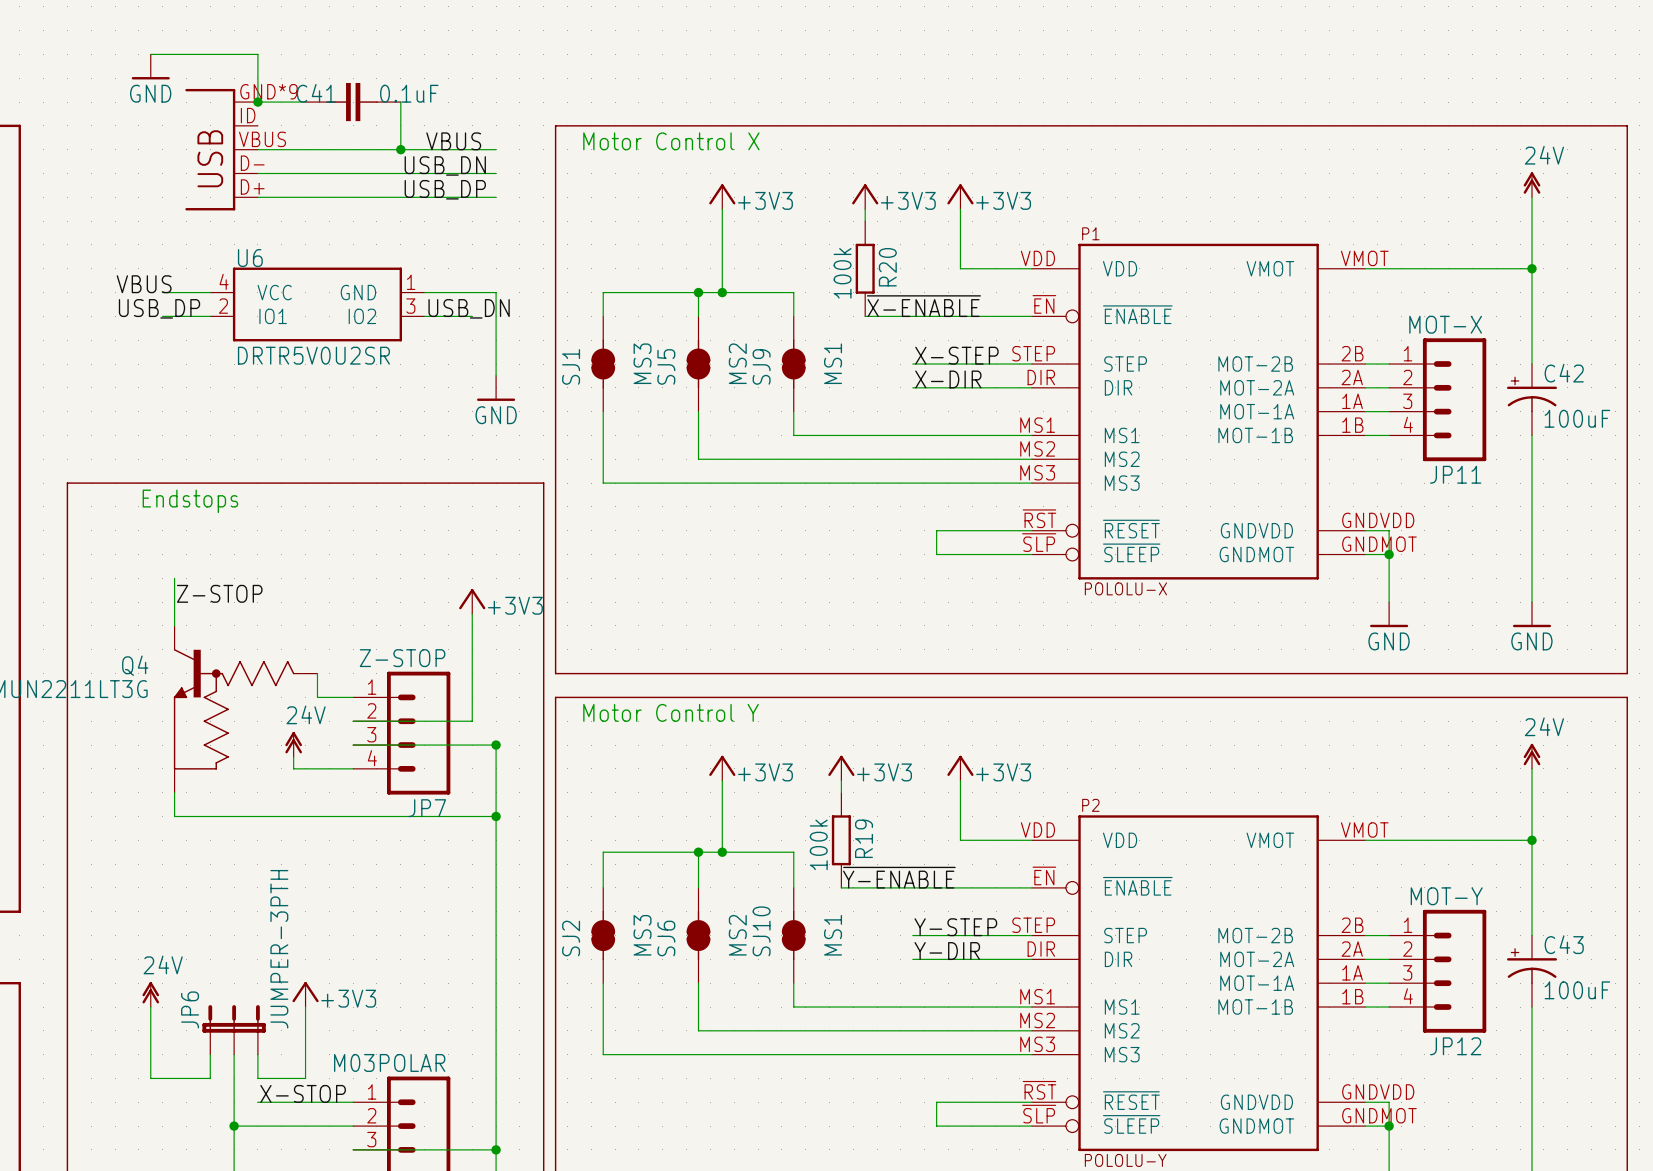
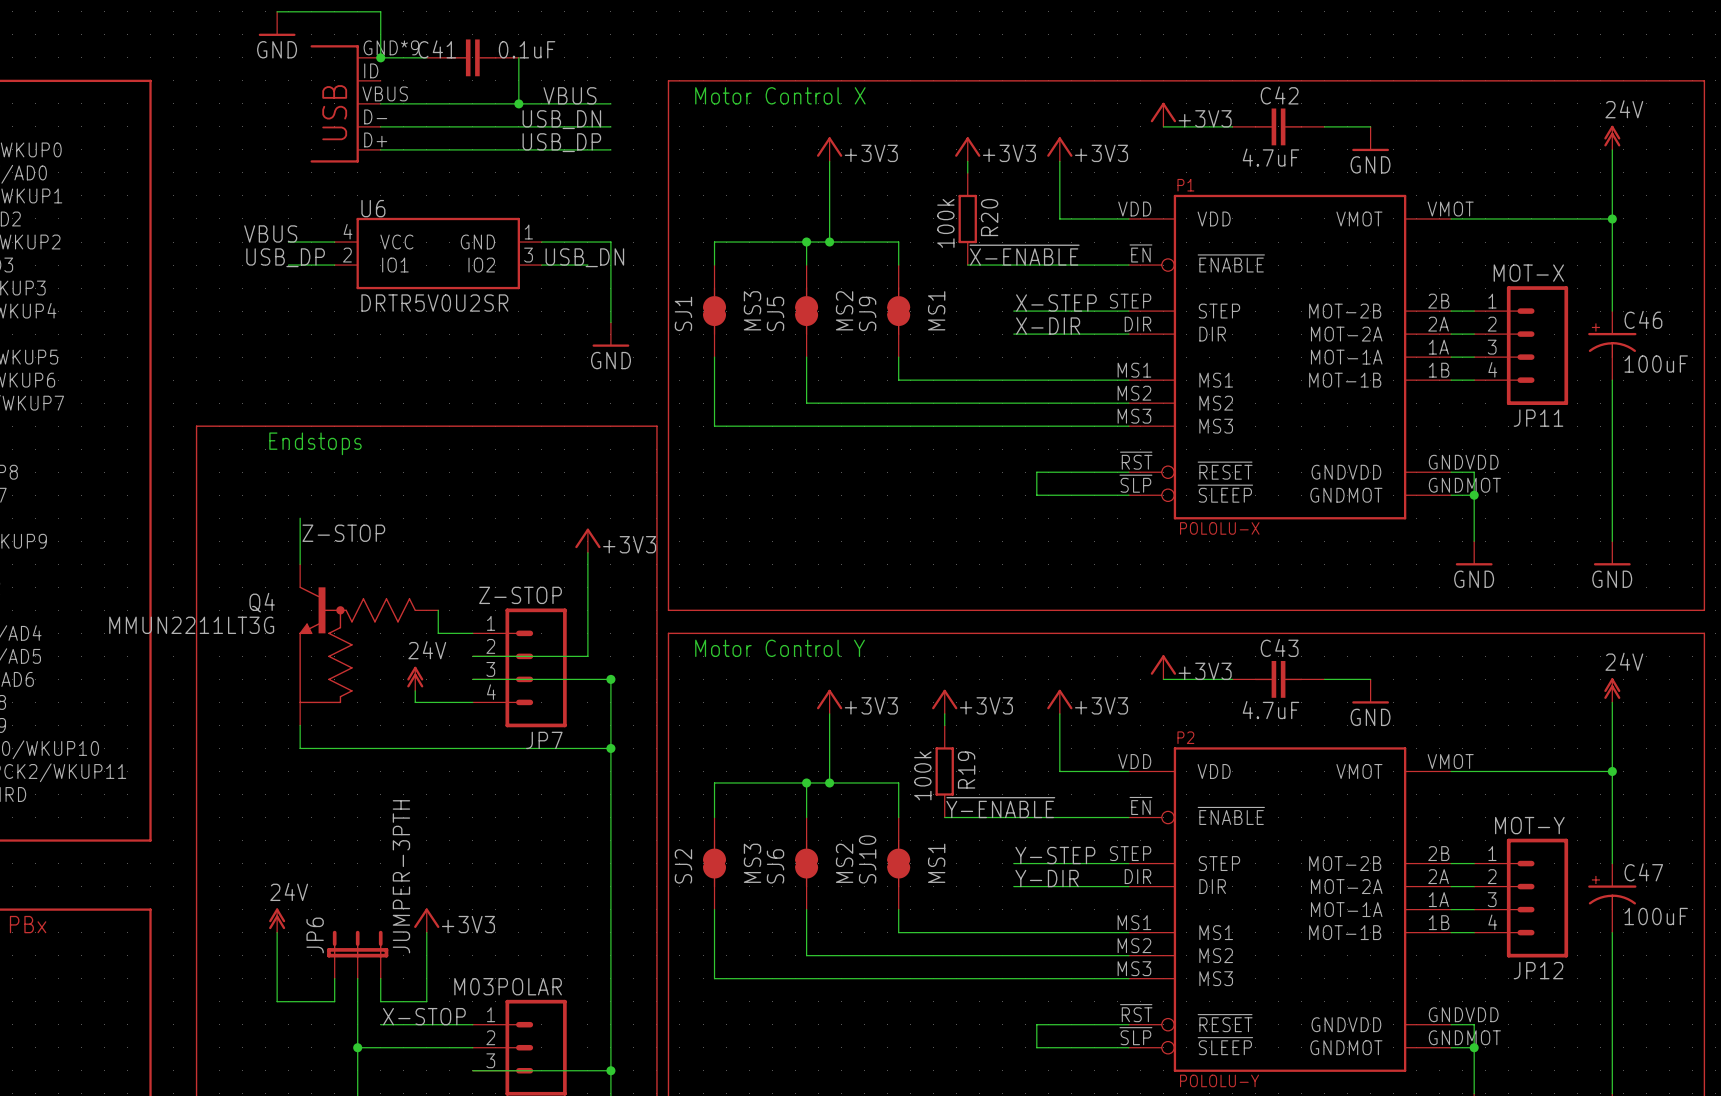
power symbol: none -> +3V3 (1163, 114)
wire: none -> (1163, 126) (1232, 126)
C42: none -> 4.7uF (1278, 126)
wire: none -> (1324, 126) (1370, 126)
power symbol: none -> GND (1370, 138)
C42 name: C42 (1564, 373) -> C46 (1643, 319)
power symbol: none -> +3V3 (1163, 667)
wire: none -> (1163, 679) (1232, 679)
C43: none -> 4.7uF (1278, 679)
wire: none -> (1324, 679) (1370, 679)
power symbol: none -> GND (1370, 691)
C43 name: C43 (1564, 944) -> C47 (1643, 872)

